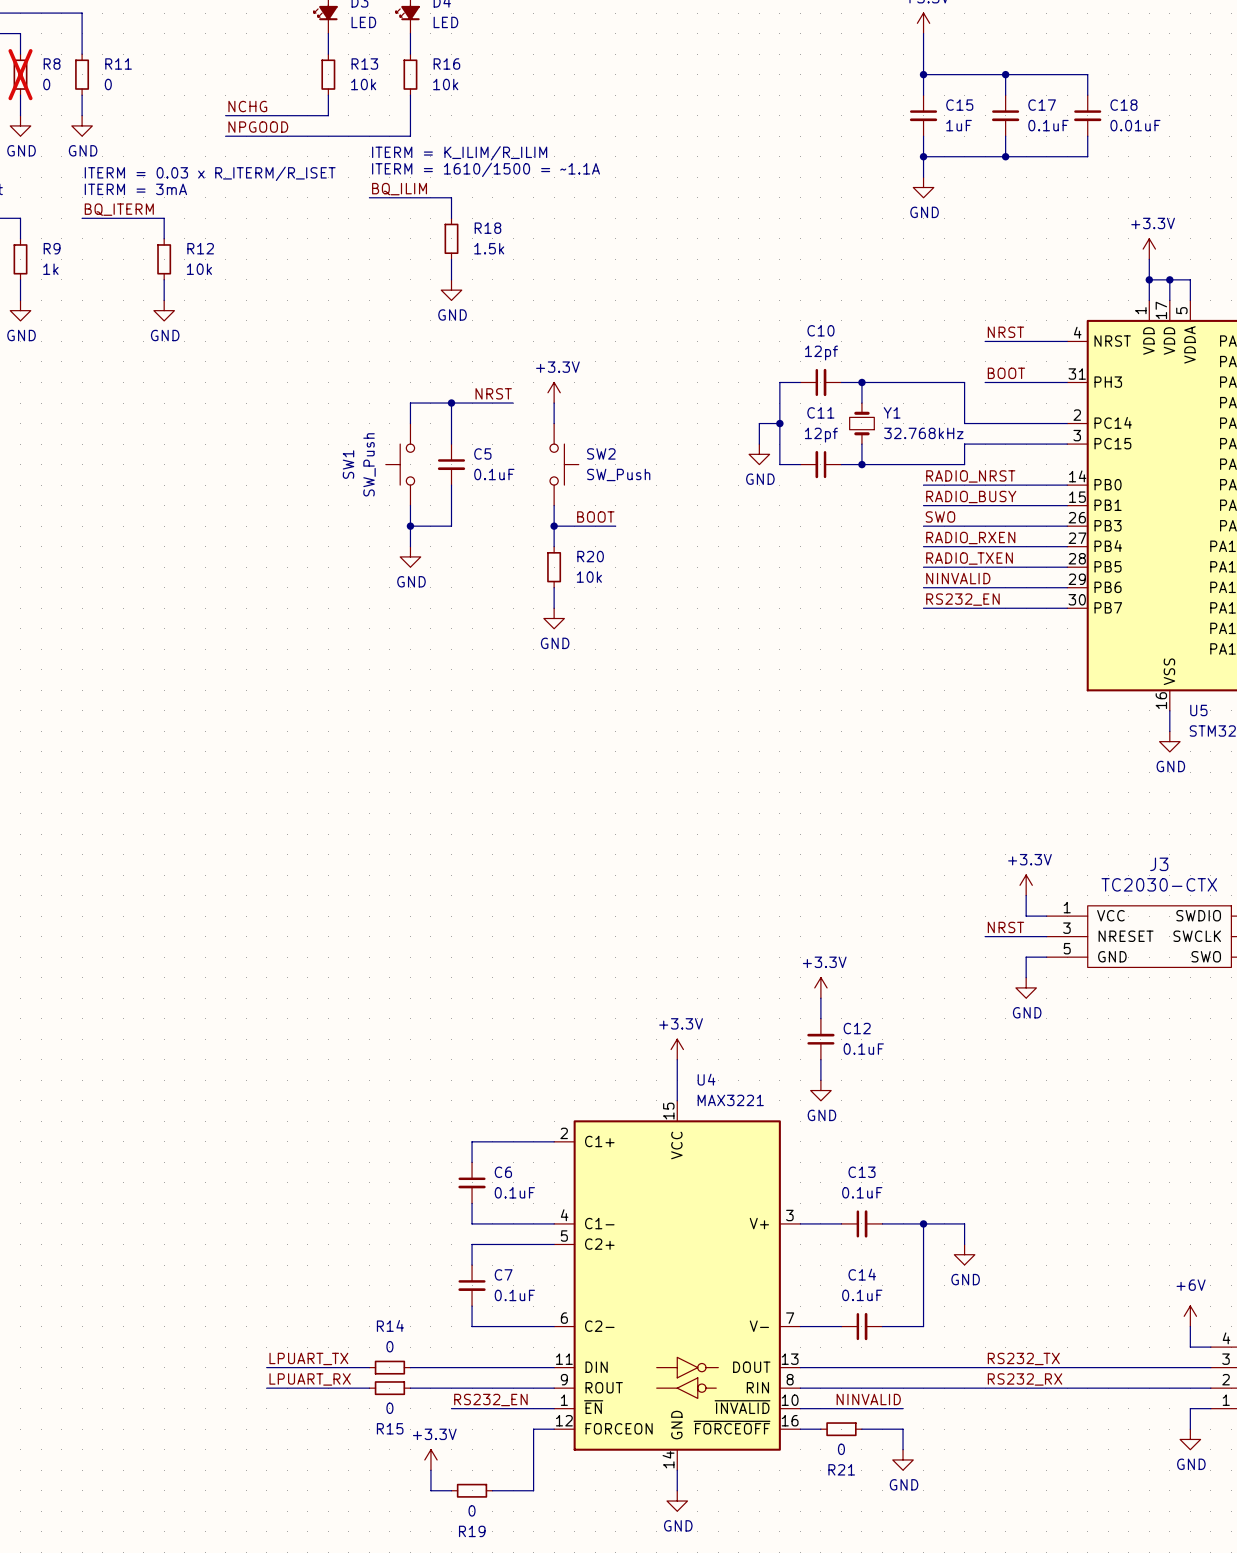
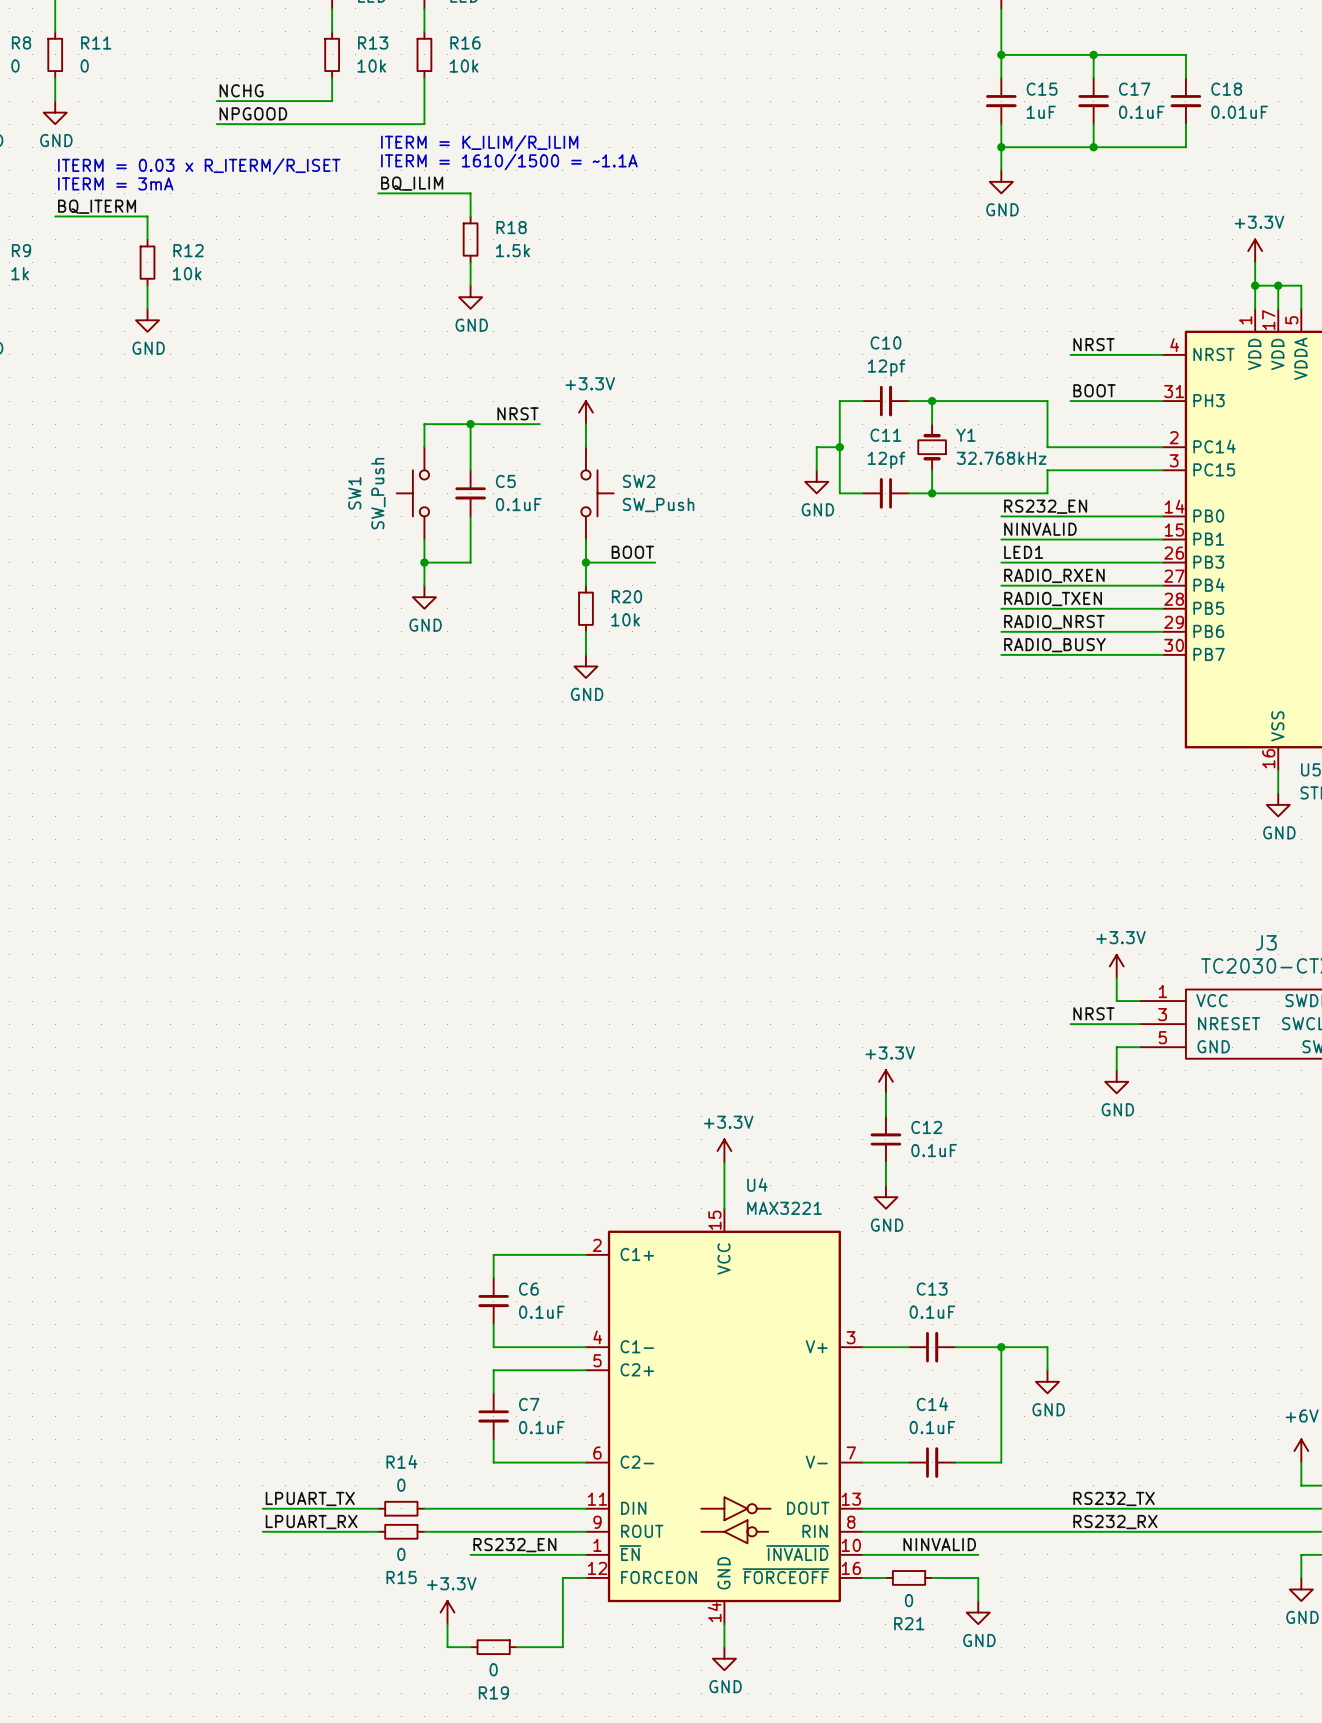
label: RADIO_NRST (970, 476) -> RS232_EN (1045, 506)
label: RADIO_BUSY (971, 496) -> NINVALID (1040, 529)
label: SWO (940, 516) -> LED1 (1023, 552)
label: NINVALID (958, 578) -> RADIO_NRST (1054, 622)
label: RS232_EN (962, 599) -> RADIO_BUSY (1054, 645)

